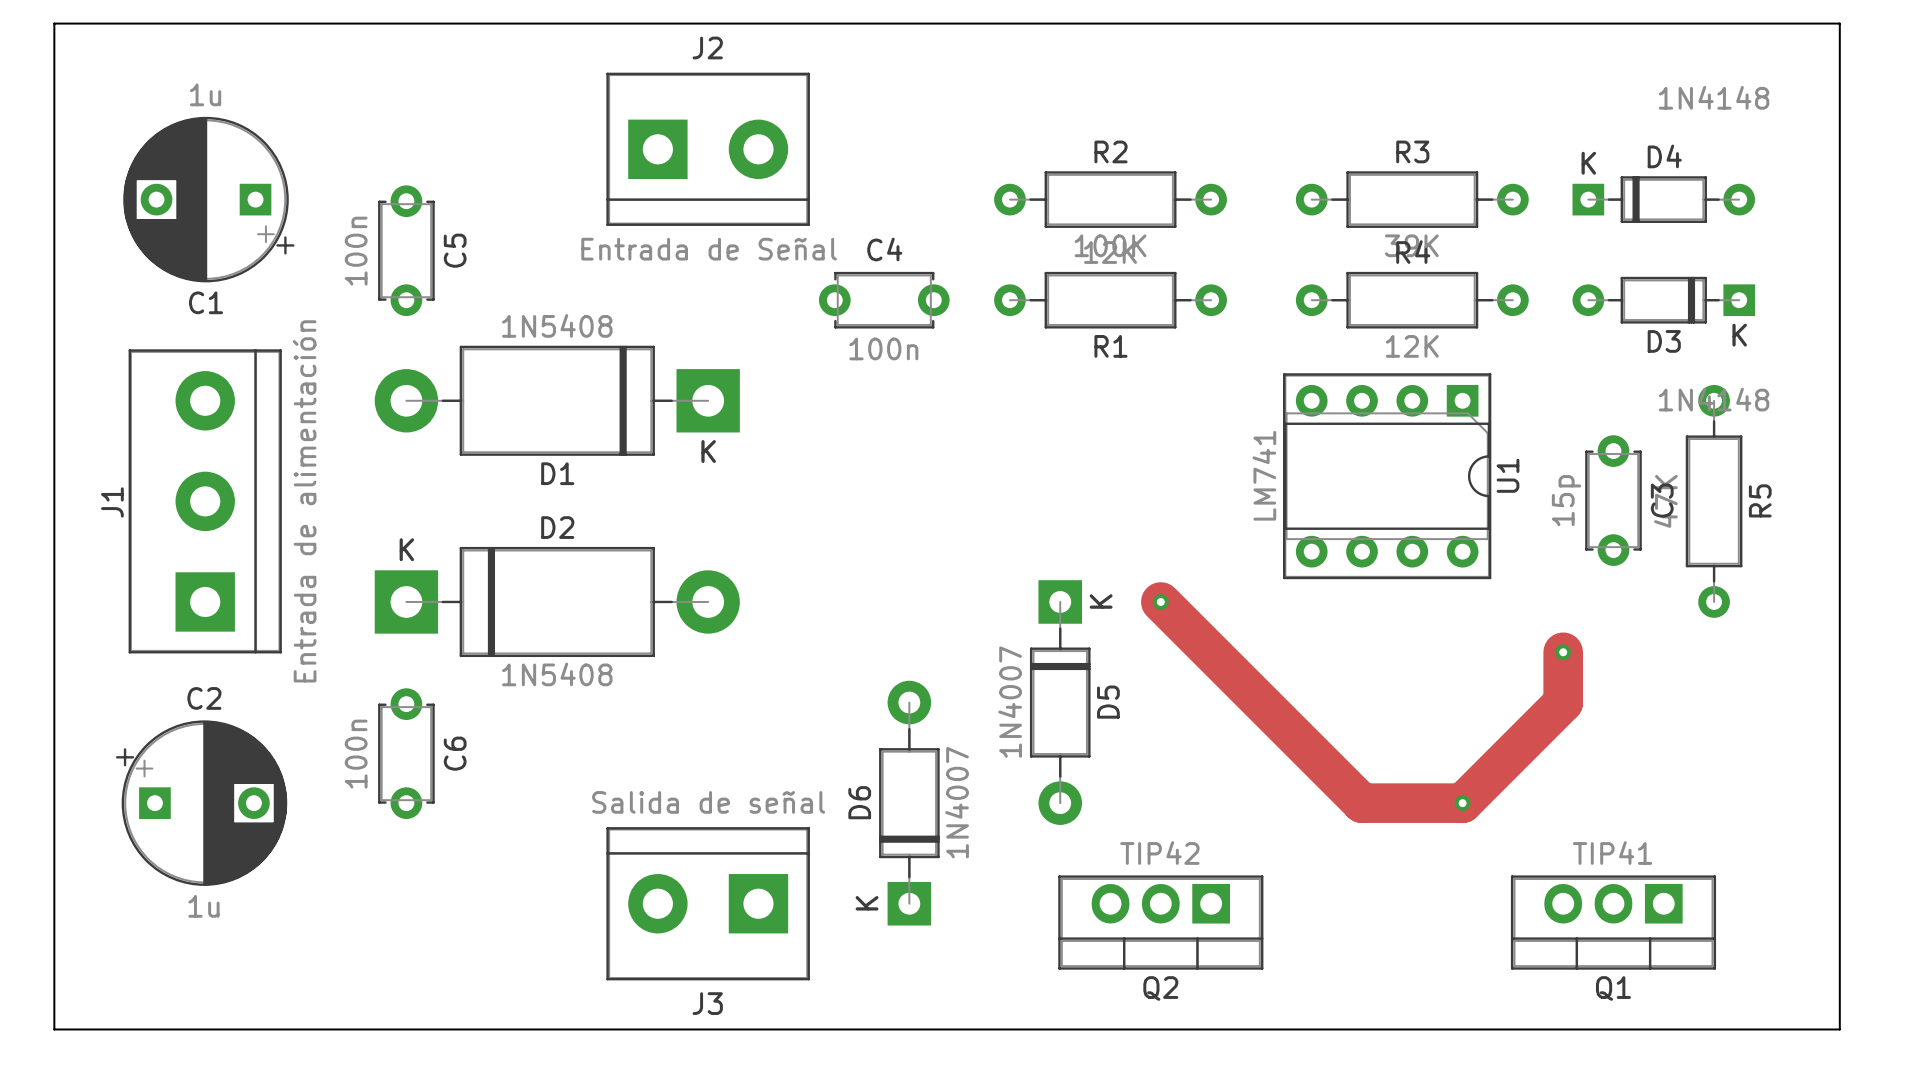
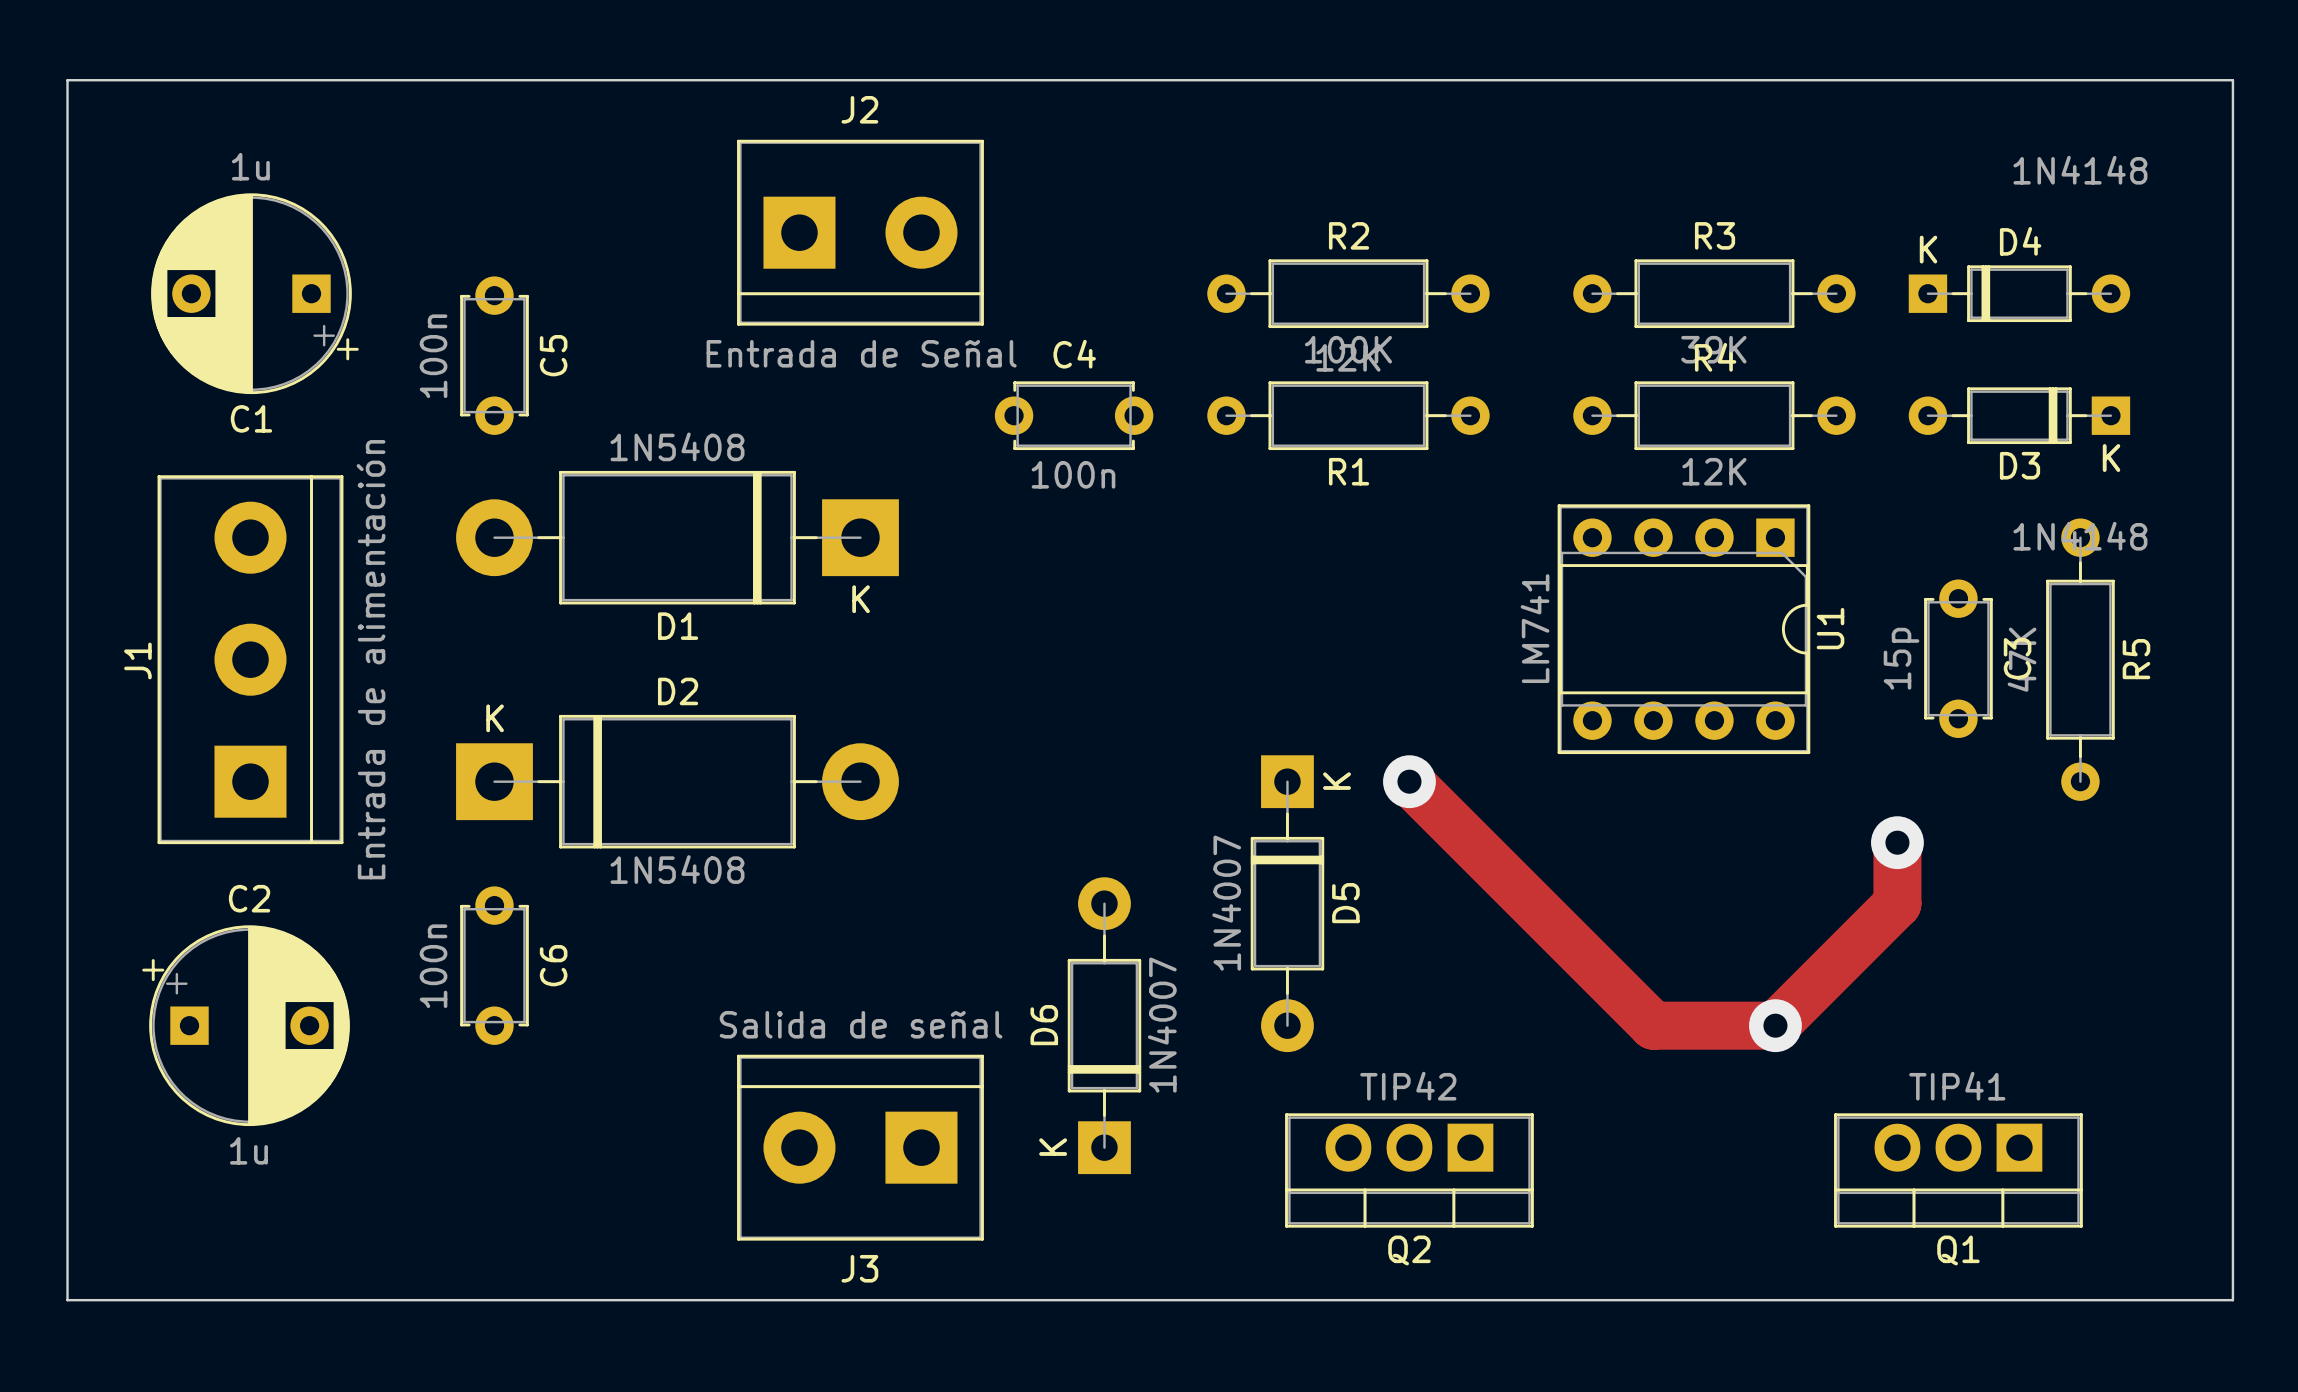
via size: [1152, 594, 1169, 610] -> [1383, 755, 1436, 809]
via size: [1555, 644, 1572, 661] -> [1871, 816, 1924, 870]
via size: [1454, 795, 1471, 812] -> [1749, 999, 1802, 1053]

